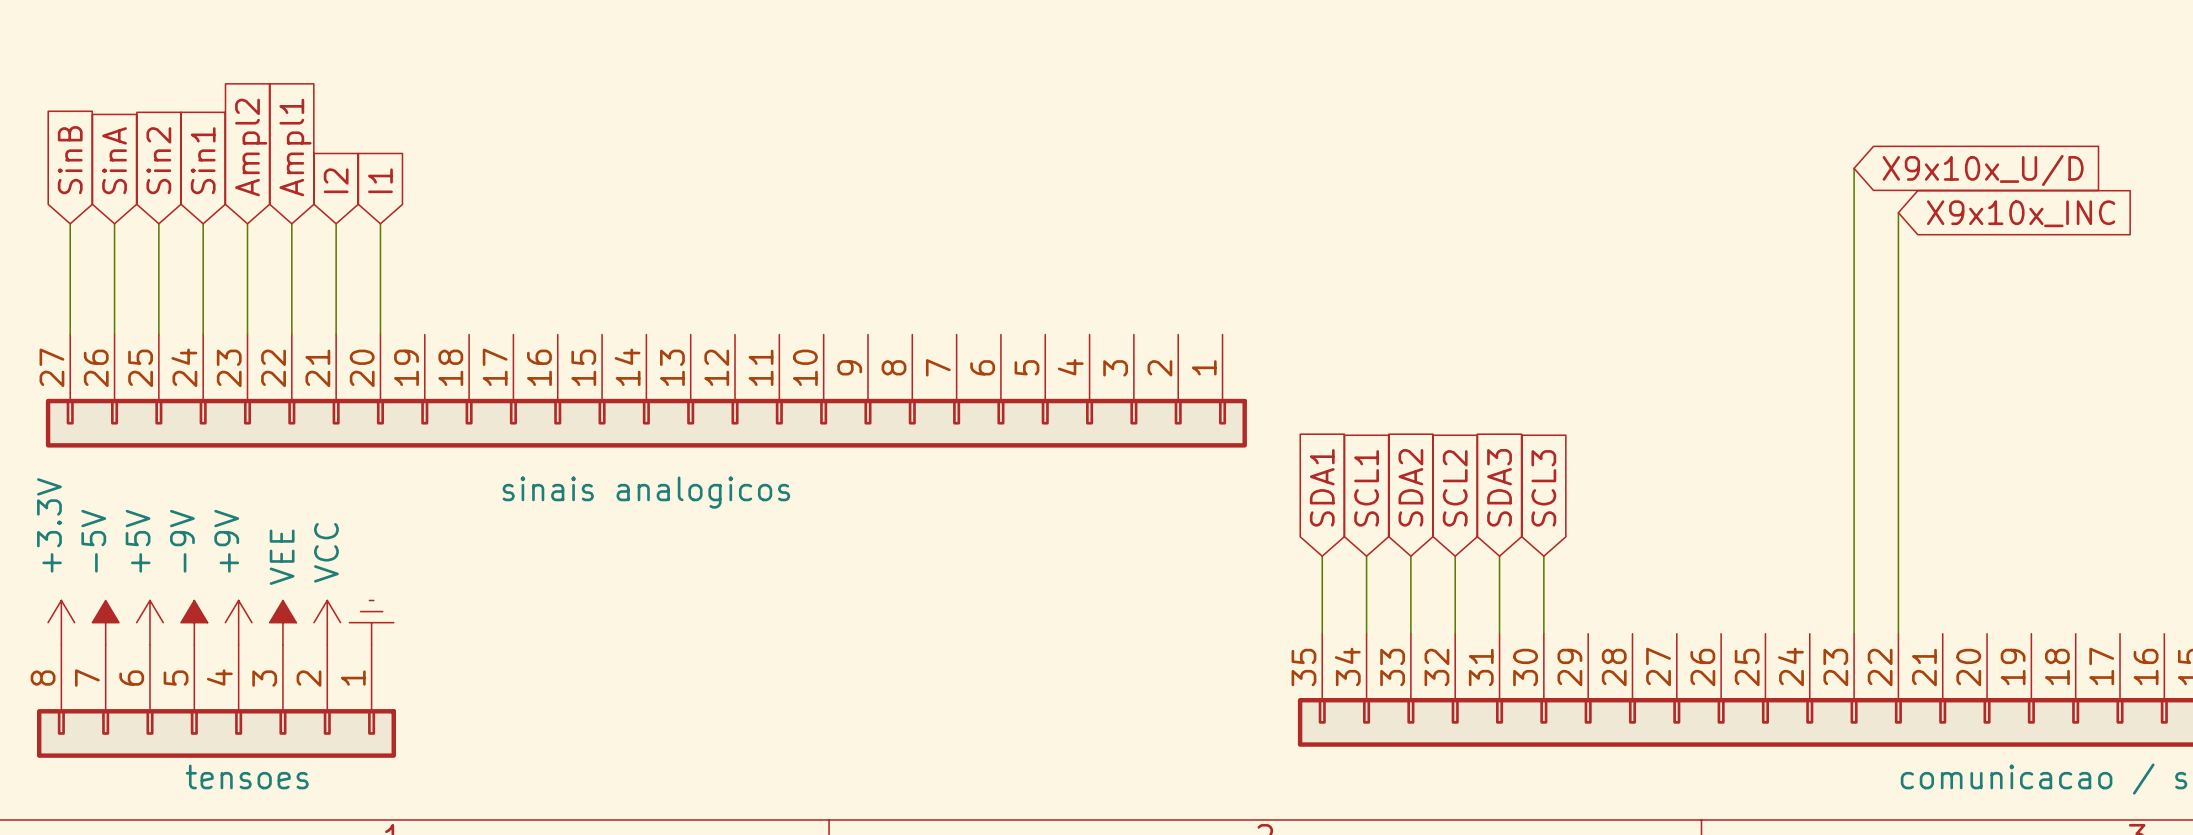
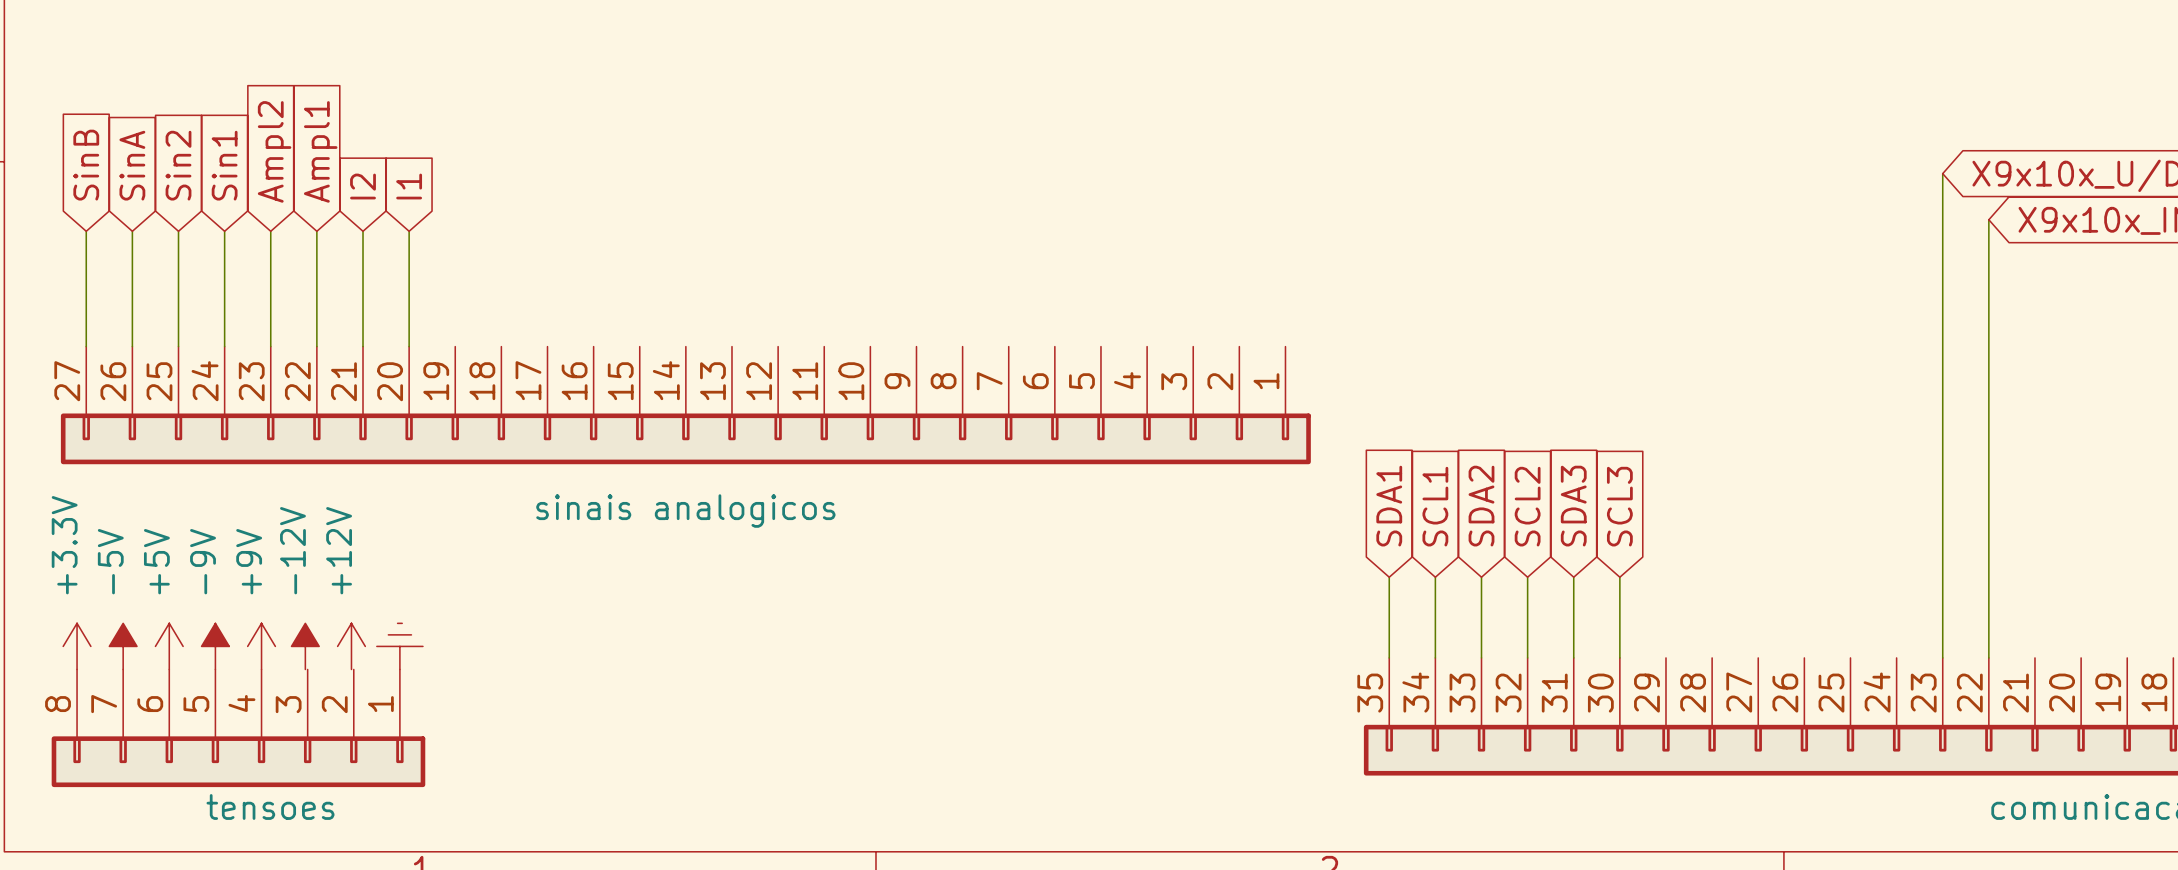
power symbol: VEE (282, 622) -> -12V (305, 646)
power symbol: VCC (327, 622) -> +12V (351, 646)

